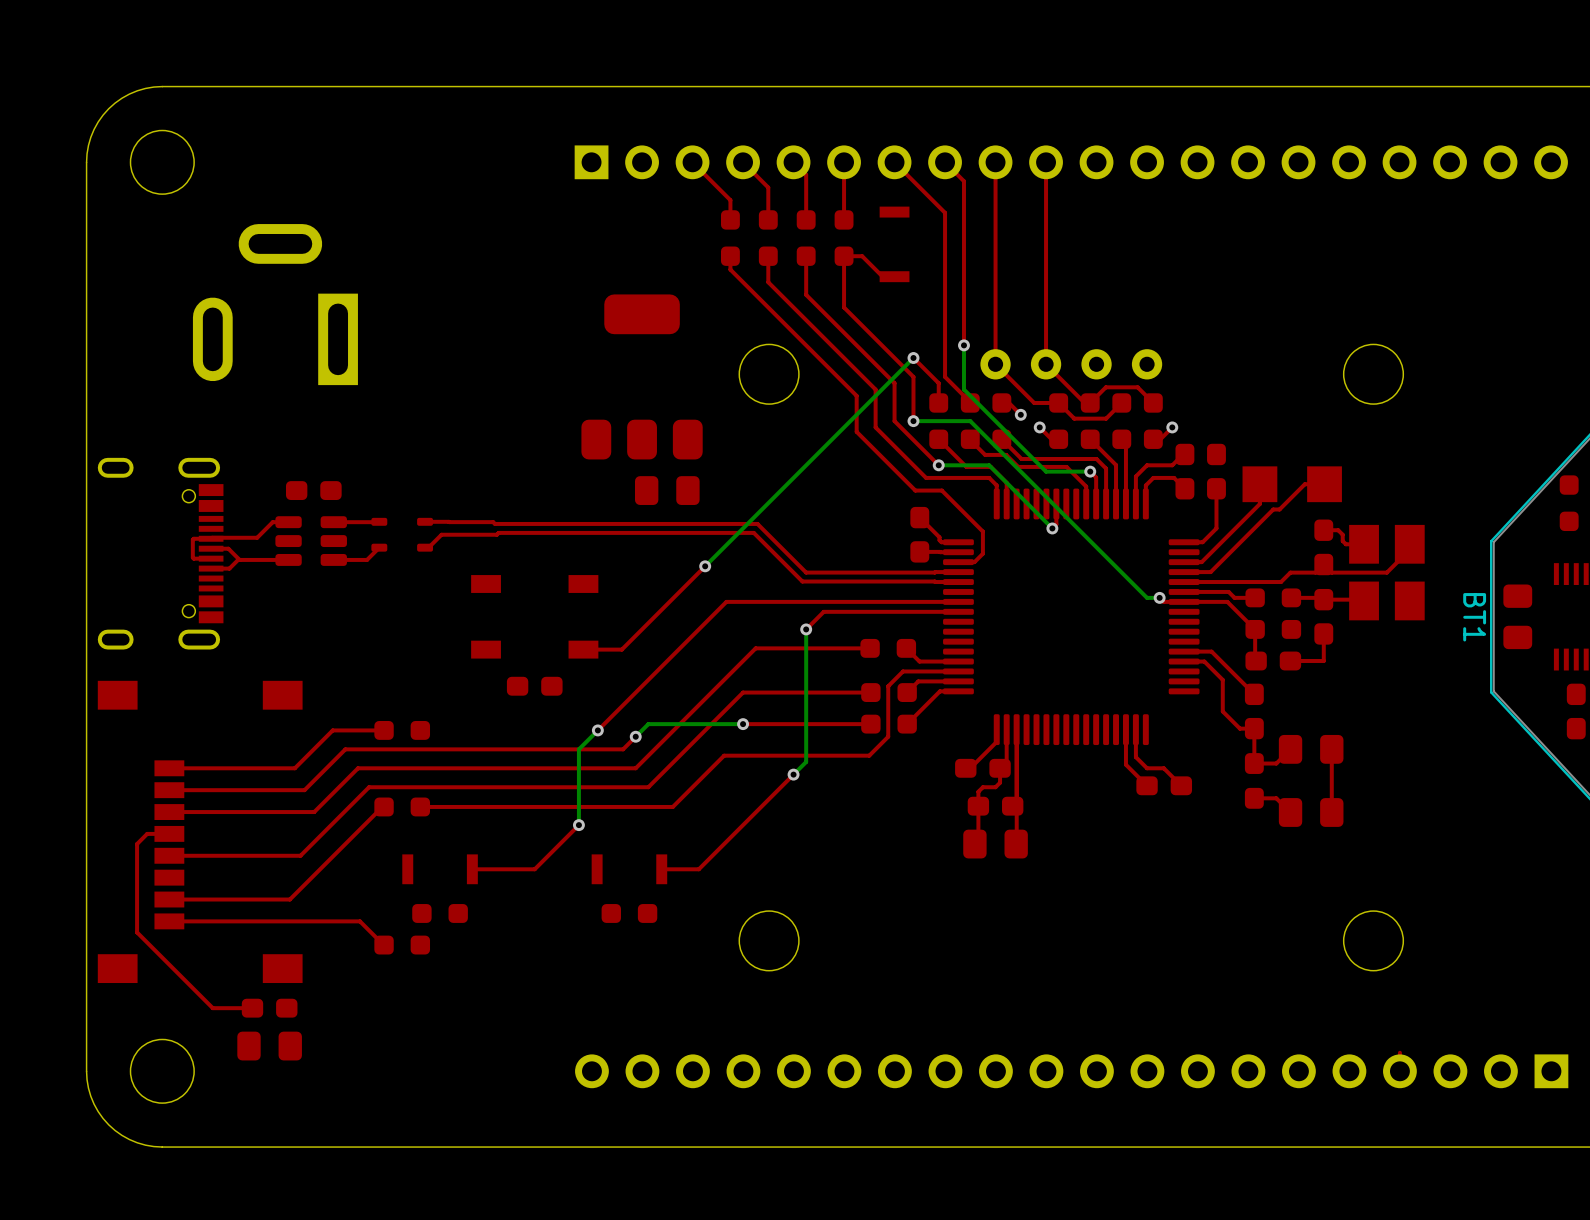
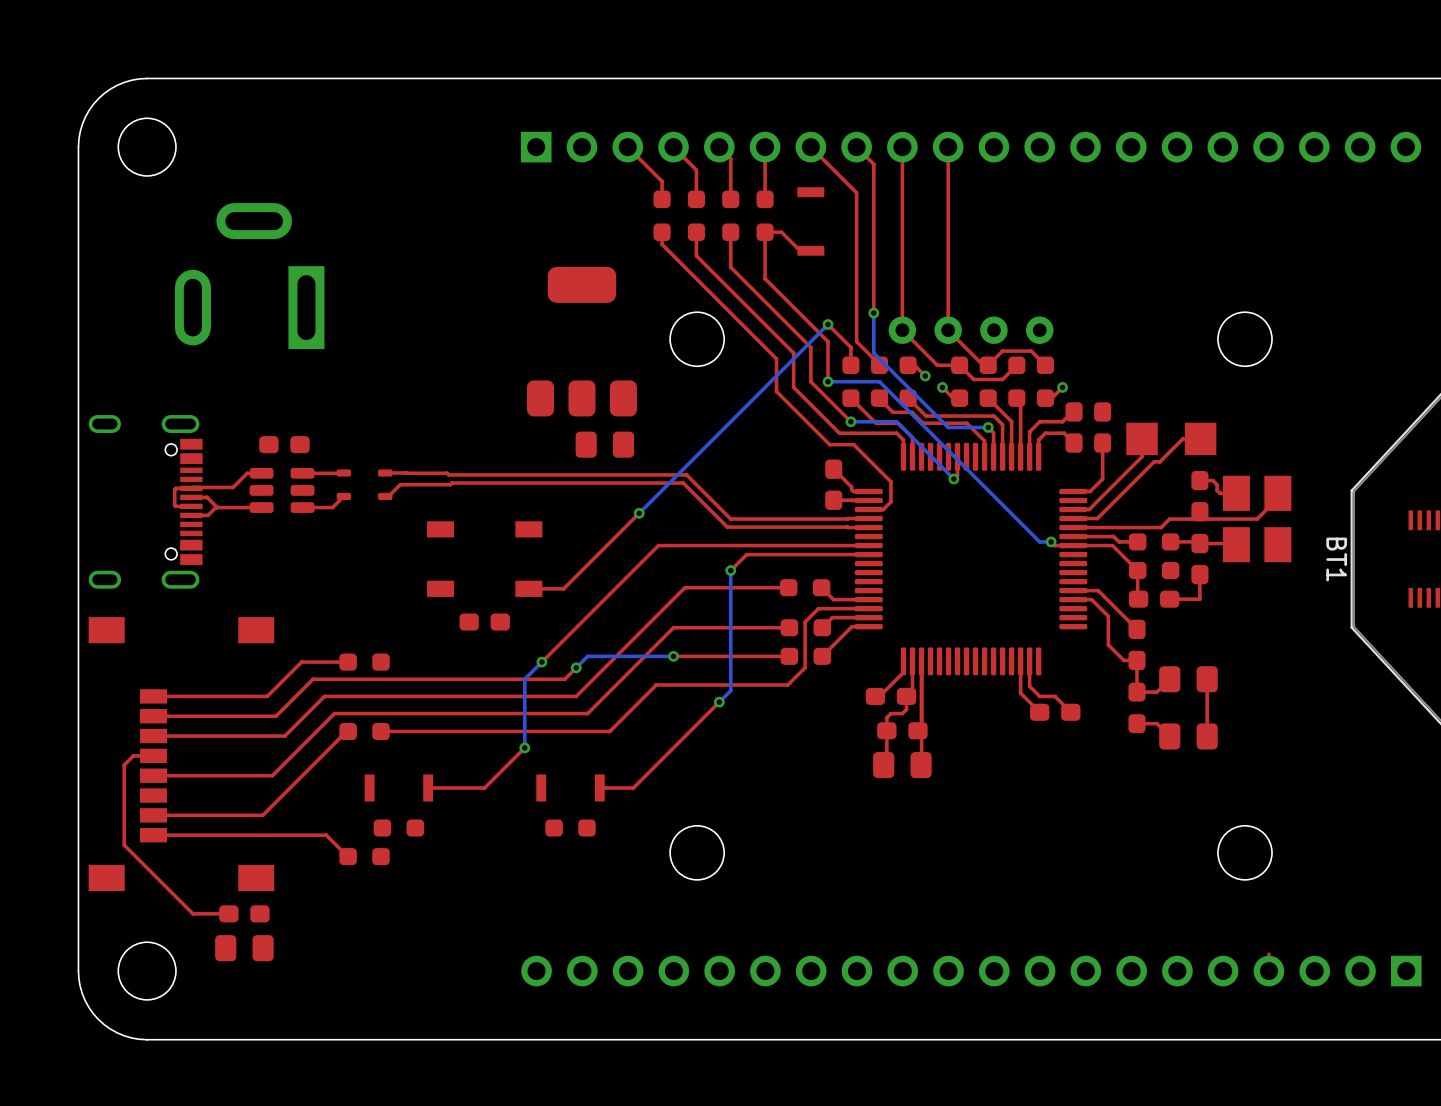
part: (1569, 503) -> none
part: (1517, 616) -> none
part: (1576, 711) -> none

